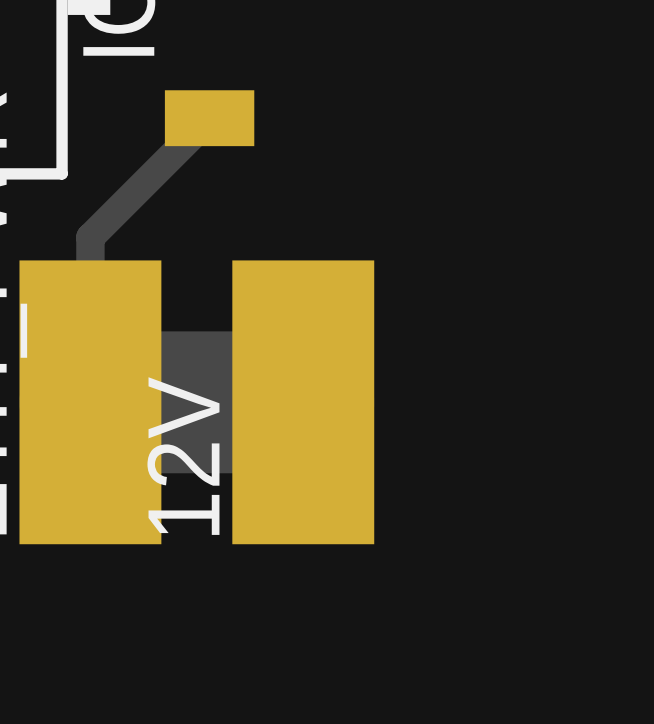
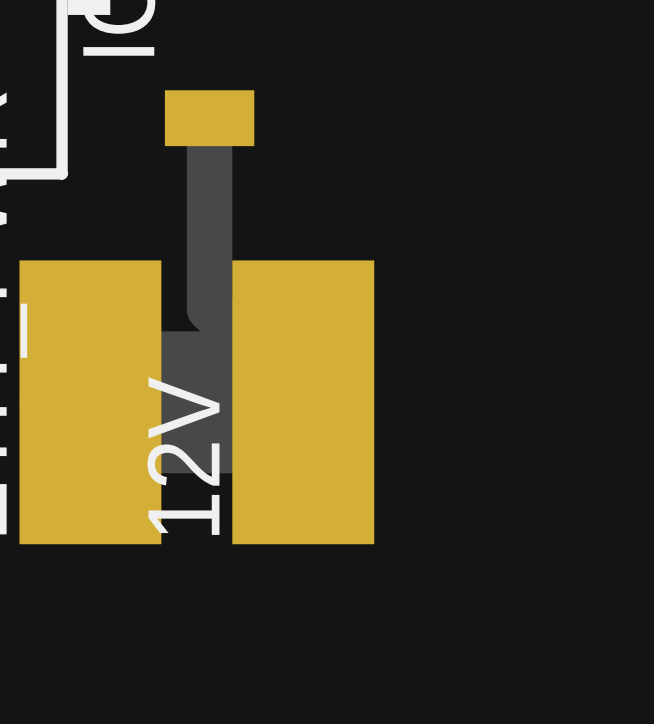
track: (209, 118) (90, 237) (90, 402) -> (209, 118) (209, 308) (303, 402)

